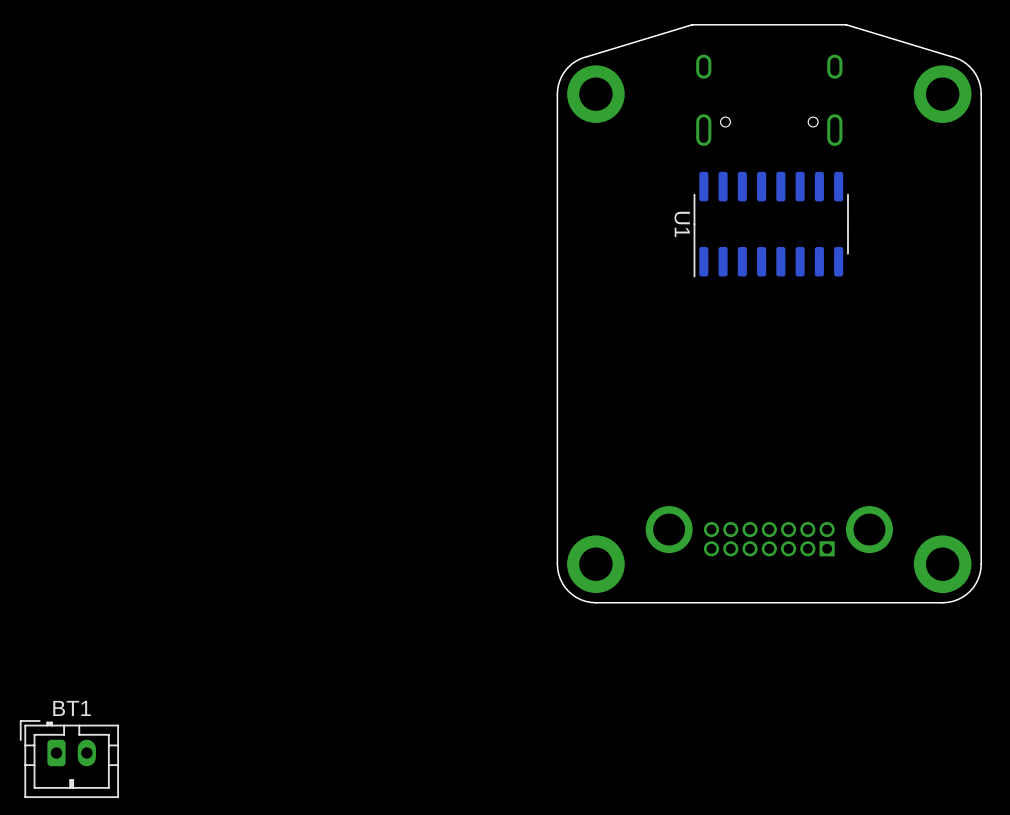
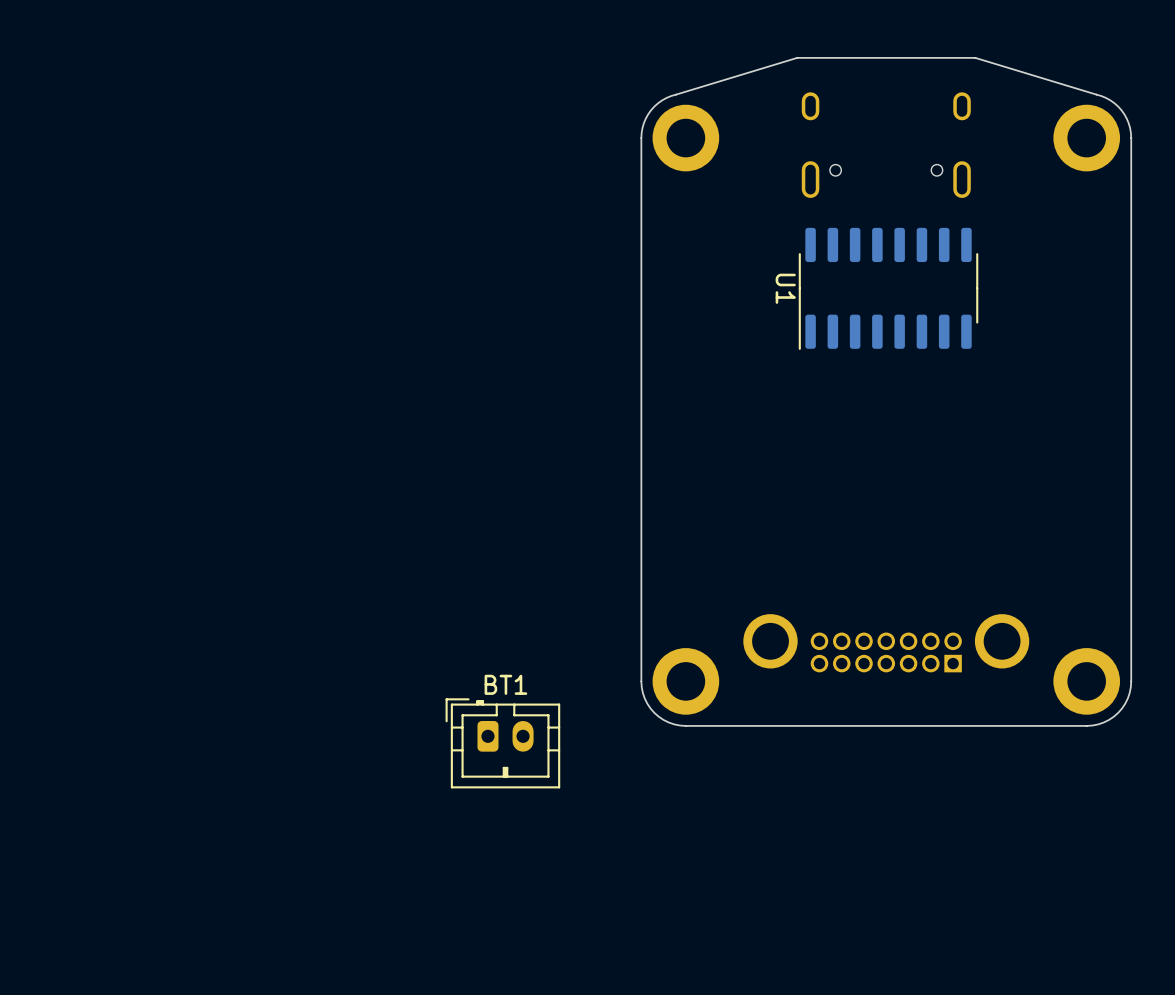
BT1 position: (69, 759) -> (502, 743)

